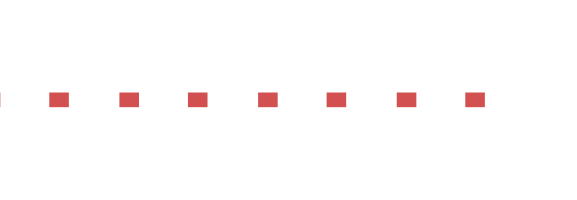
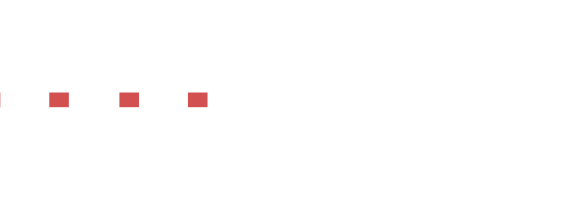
part: (302, 99) -> none
part: (440, 99) -> none

